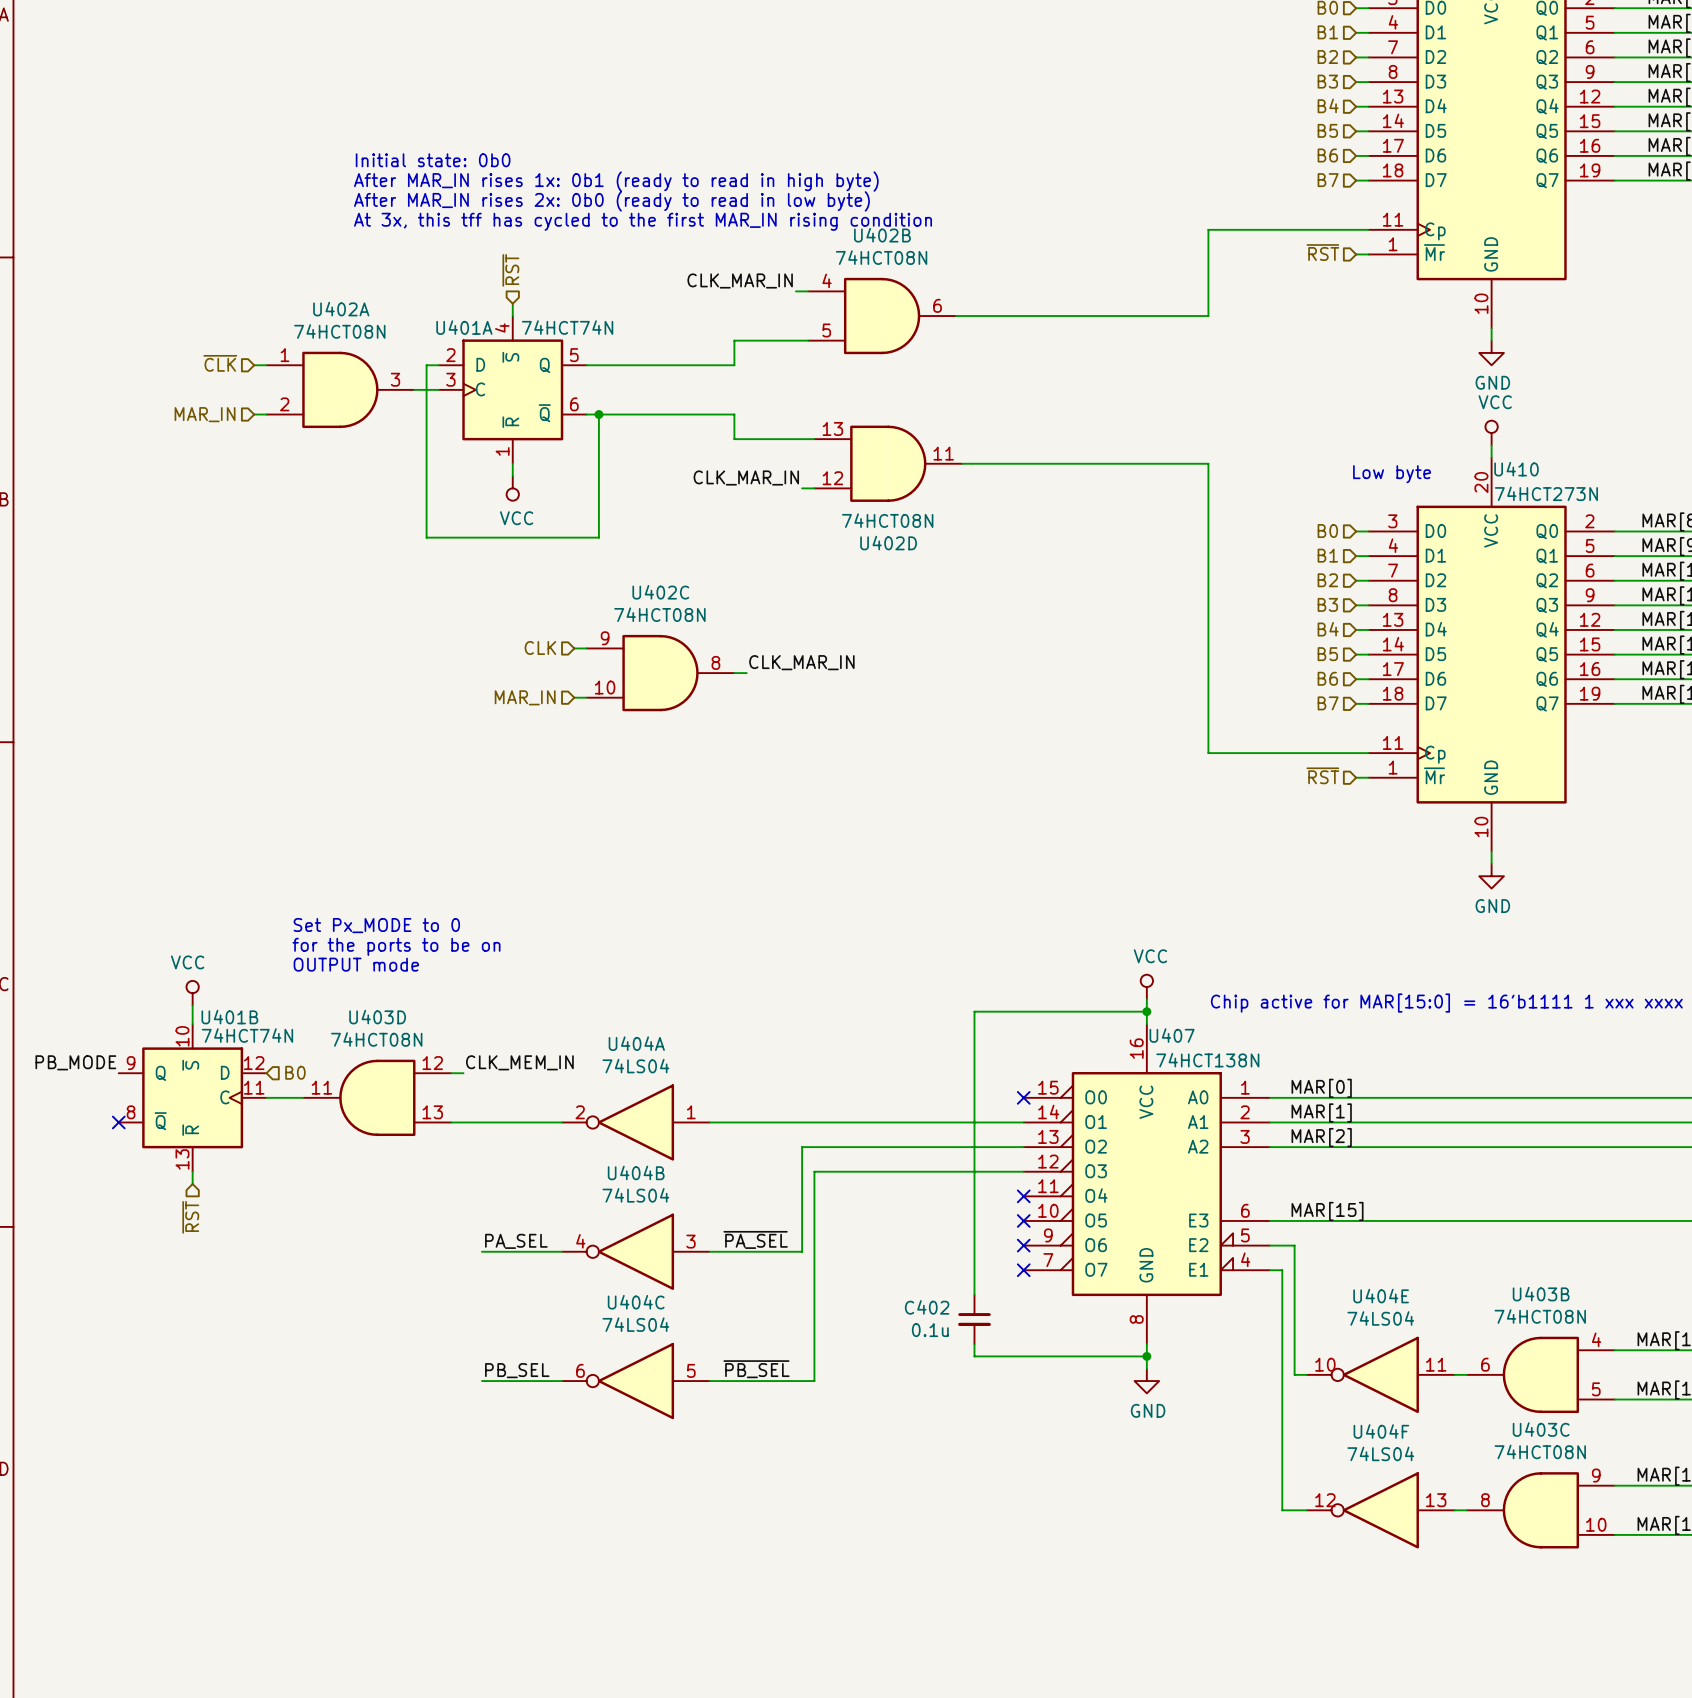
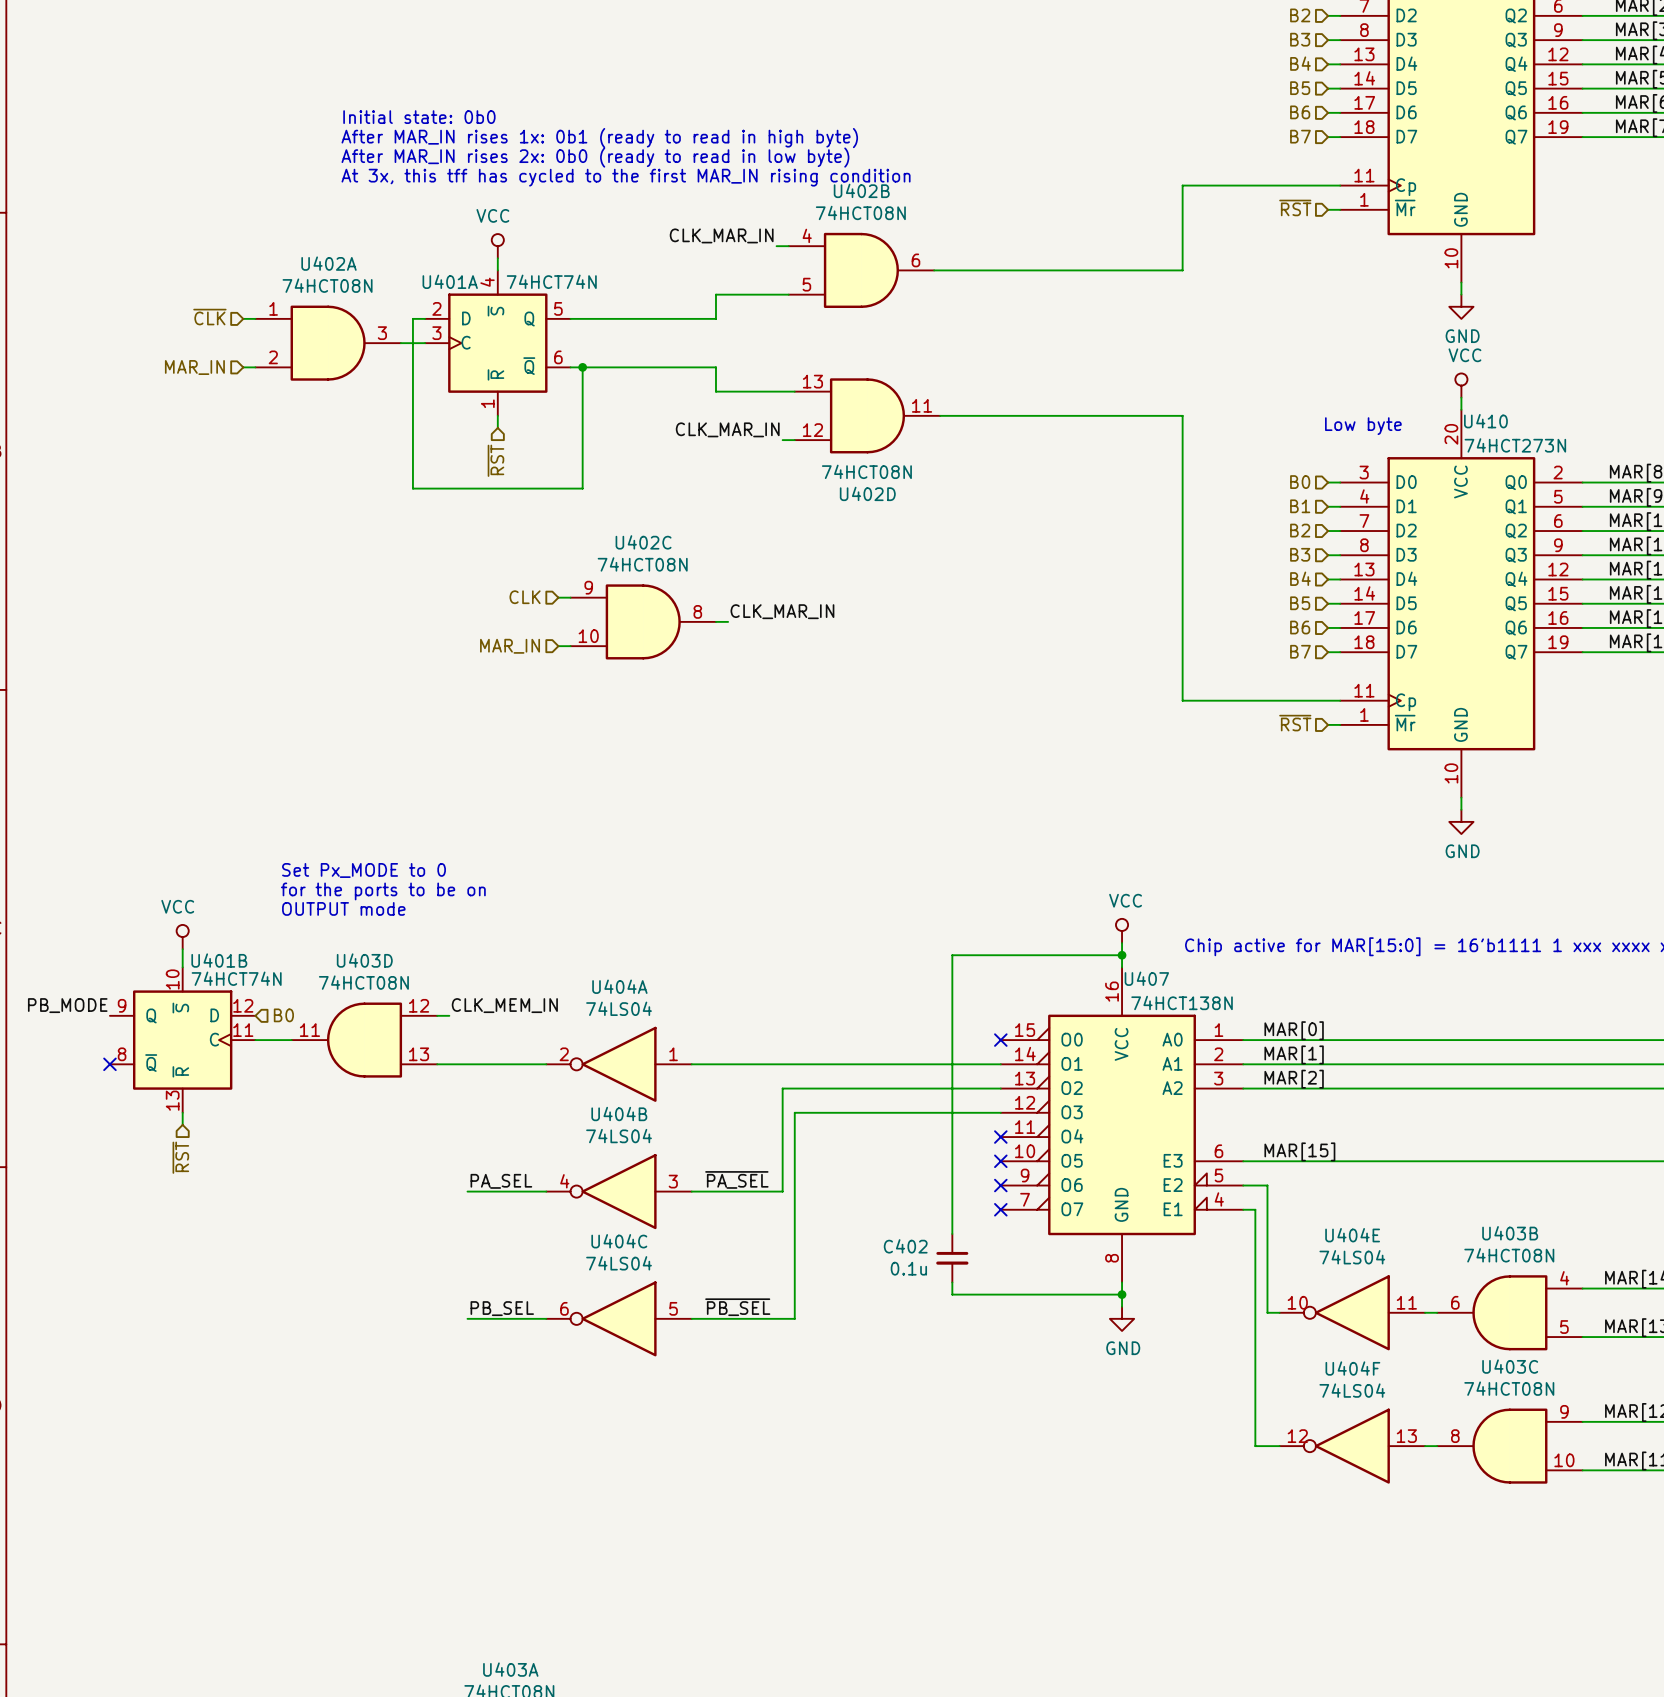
hierarchical label rotation: 0° (510, 270) -> 180° (495, 460)
hierarchical label position: ~{RST} (510, 270) -> ~{RST} (495, 460)
power symbol rotation: 0° (512, 488) -> 180° (497, 246)
power symbol position: VCC (512, 488) -> VCC (497, 246)

